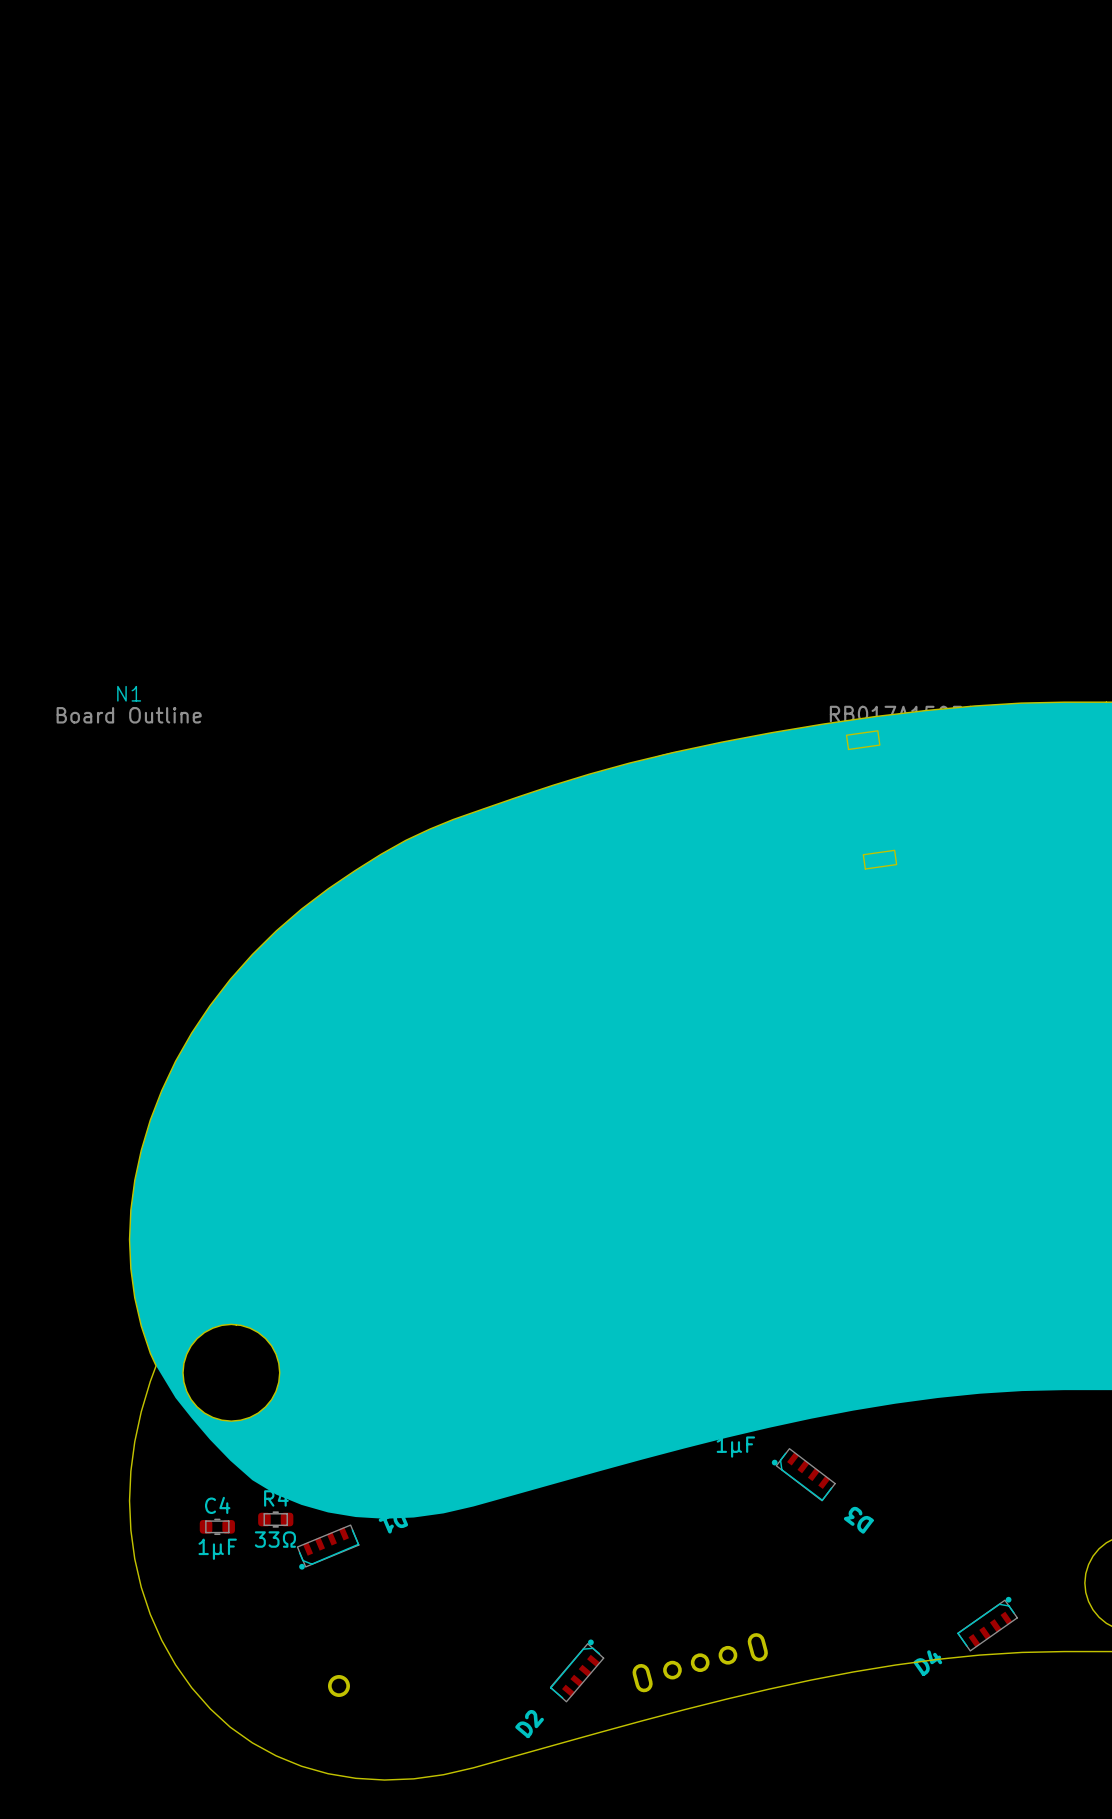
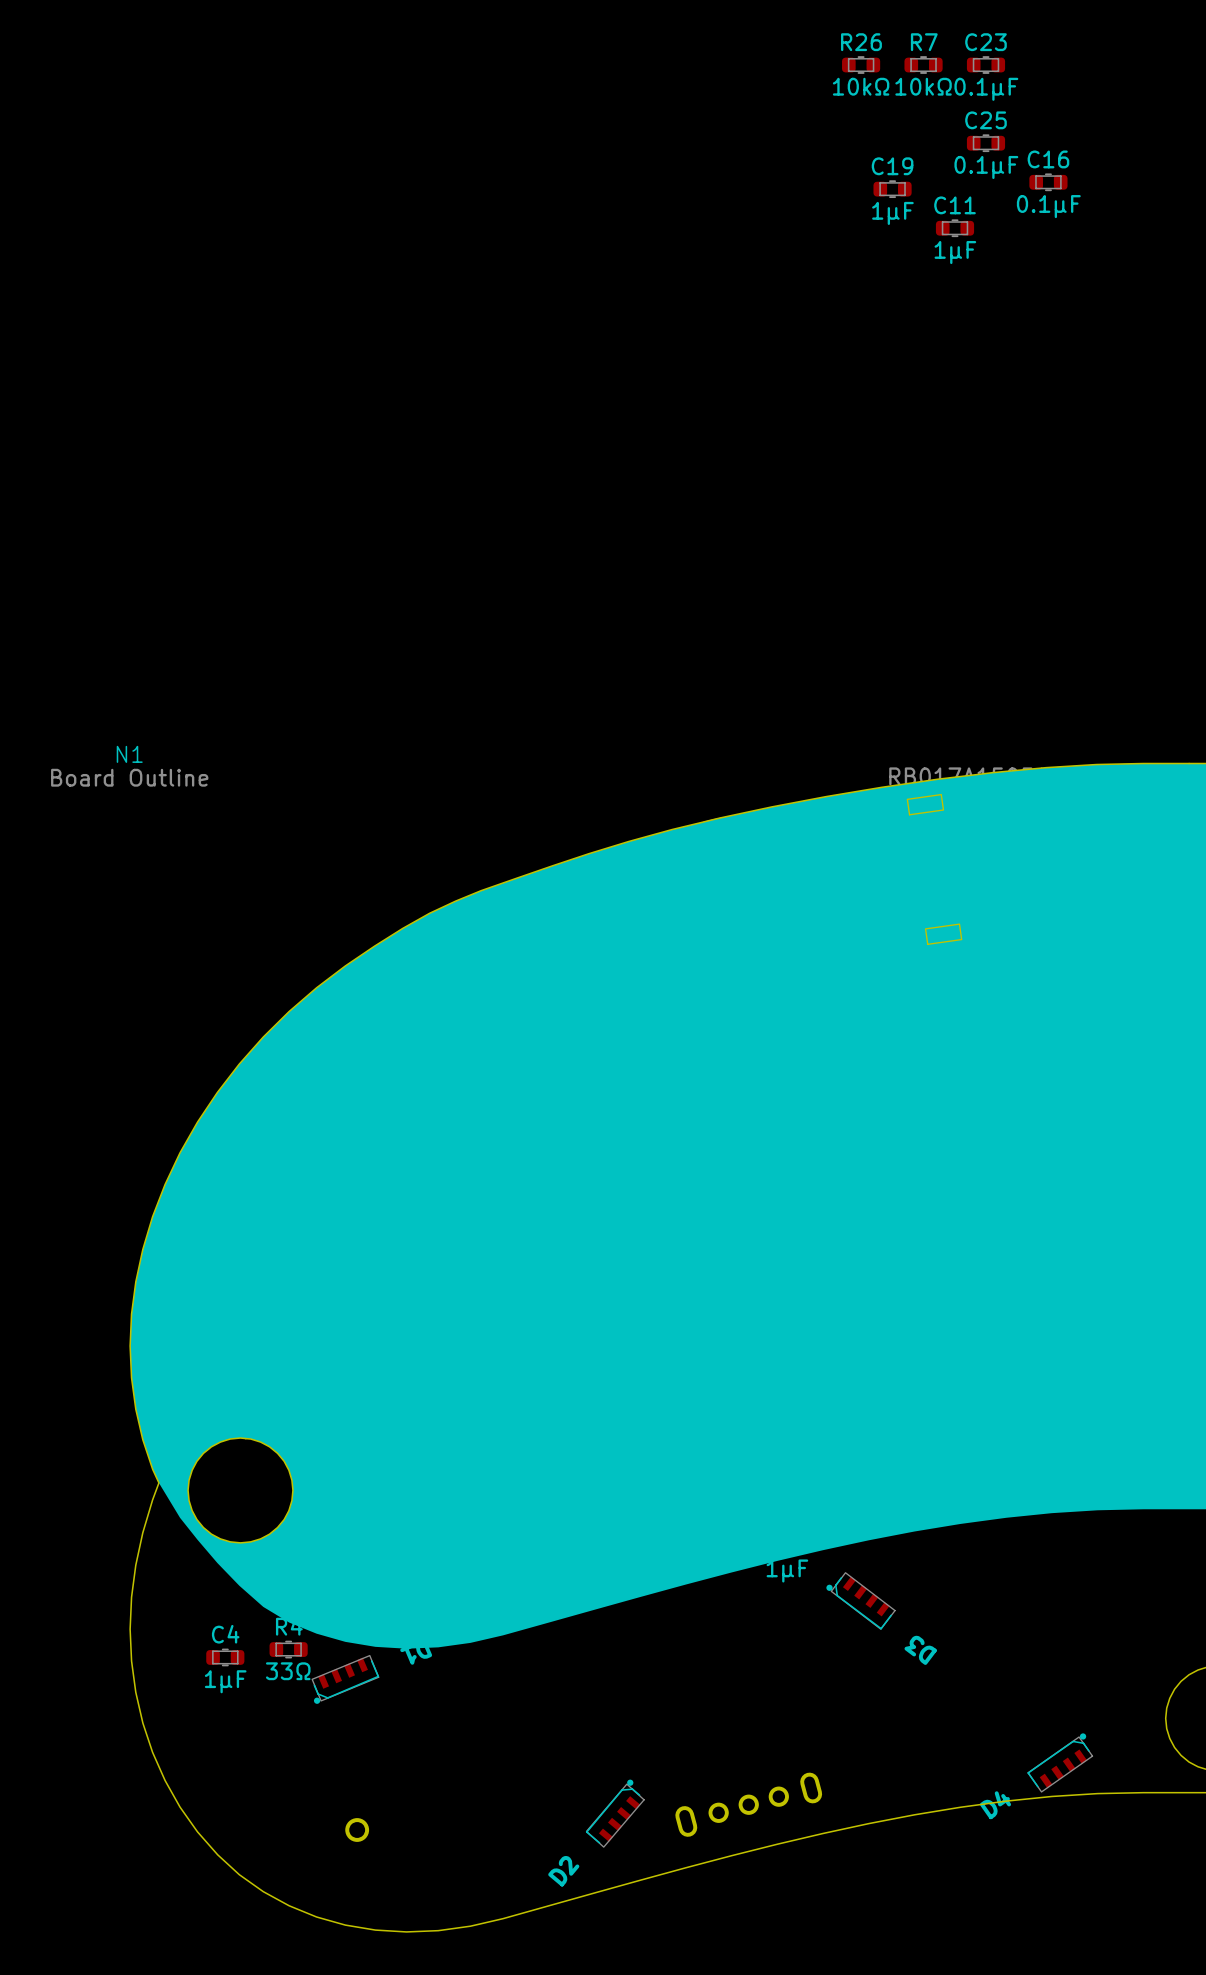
R26: none -> 10kΩ (861, 65)
R7: none -> 10kΩ (923, 65)
C23: none -> 0.1μF (985, 65)
C25: none -> 0.1μF (985, 143)
C16: none -> 0.1μF (1048, 182)
C19: none -> 1μF (892, 189)
C11: none -> 1μF (955, 228)

